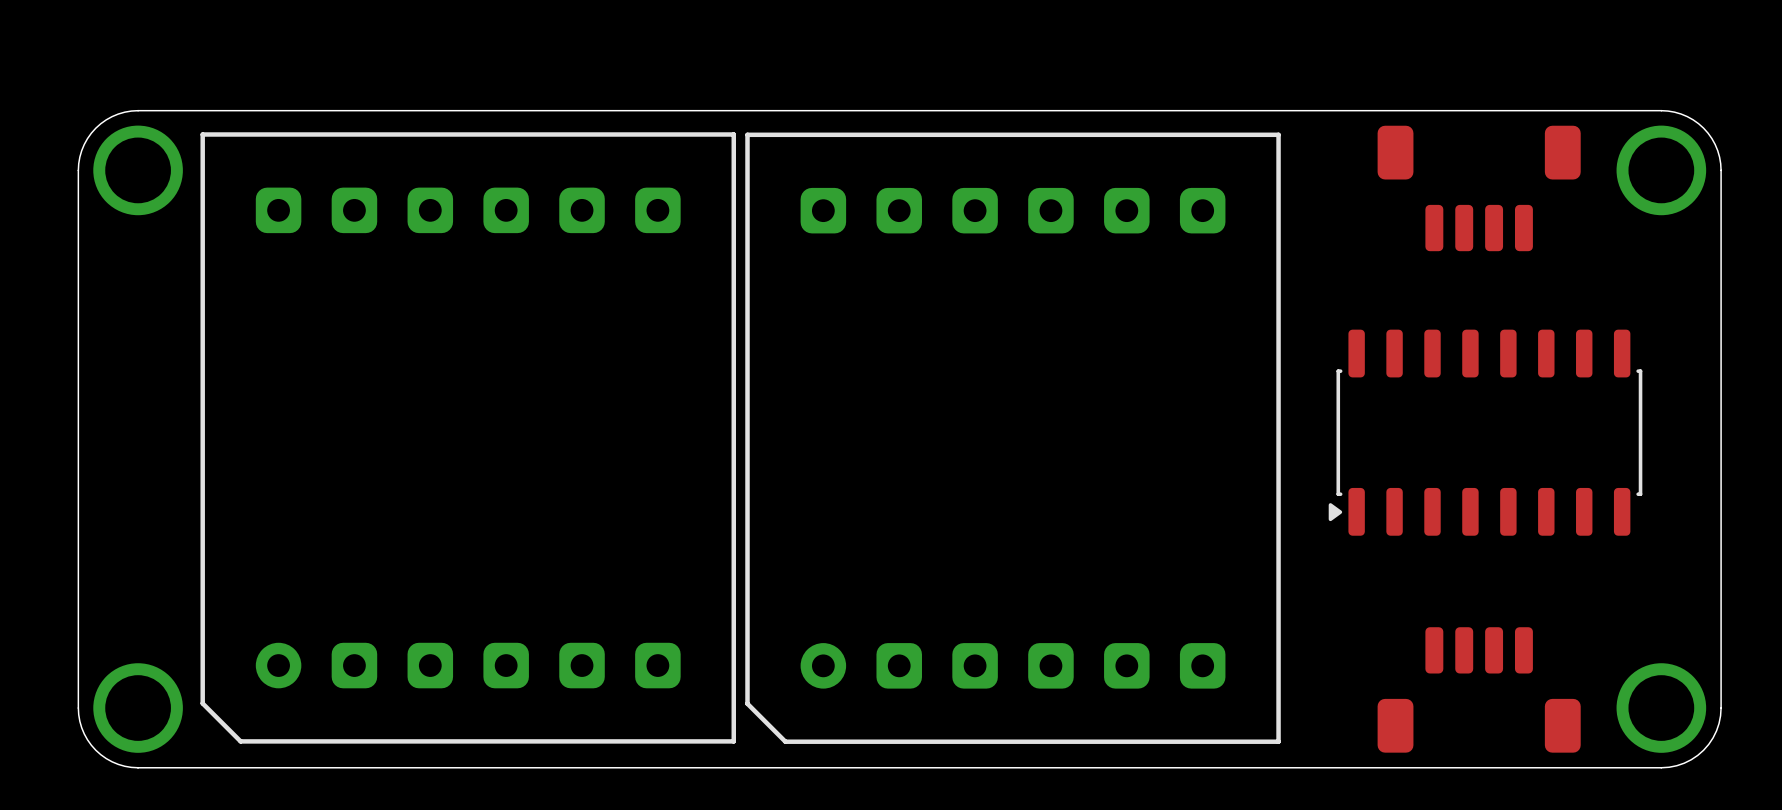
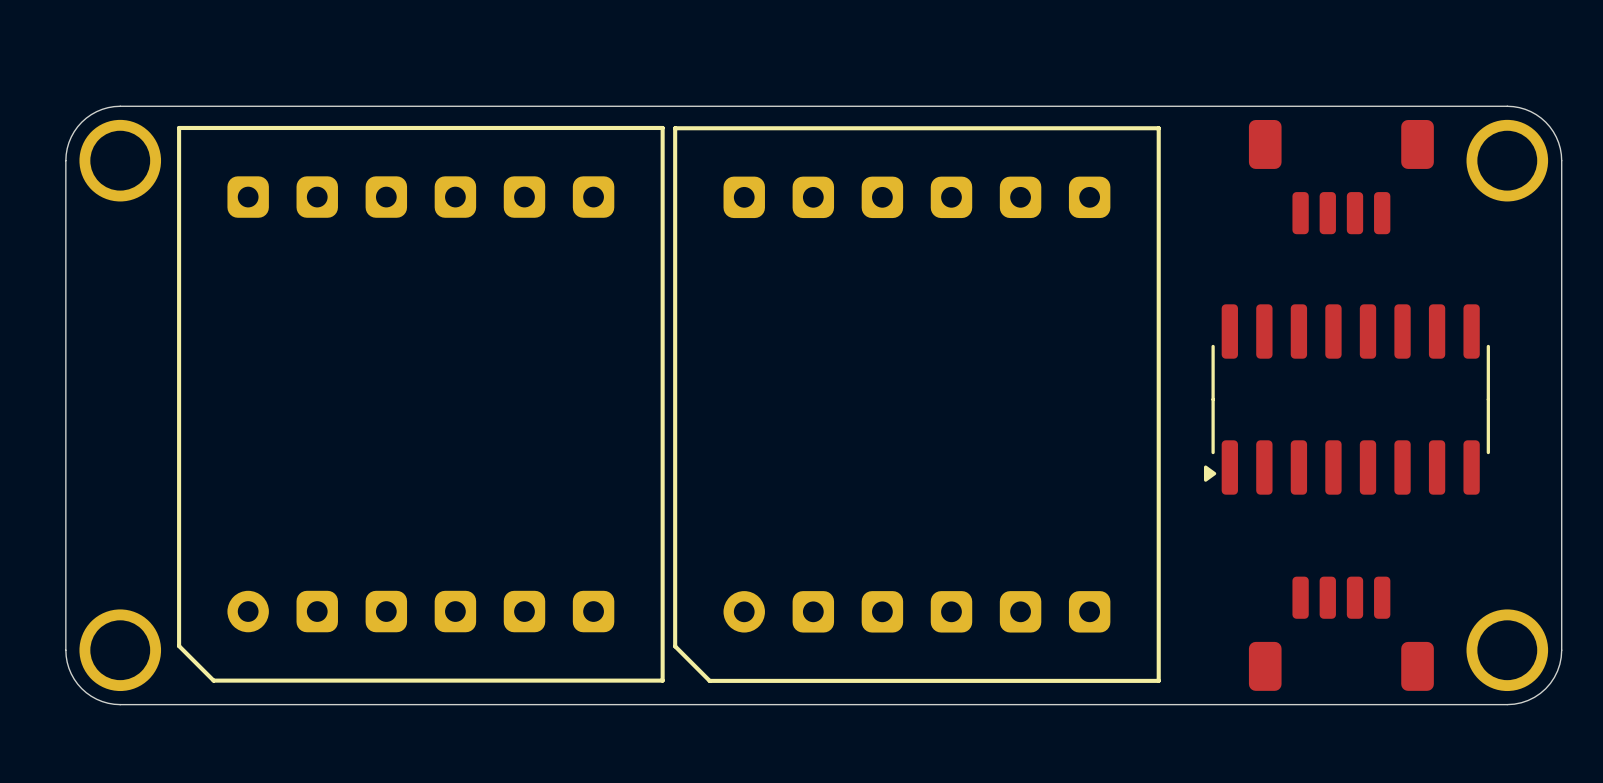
part footprint: [1328, 329, 1643, 536] -> [1203, 304, 1490, 495]

